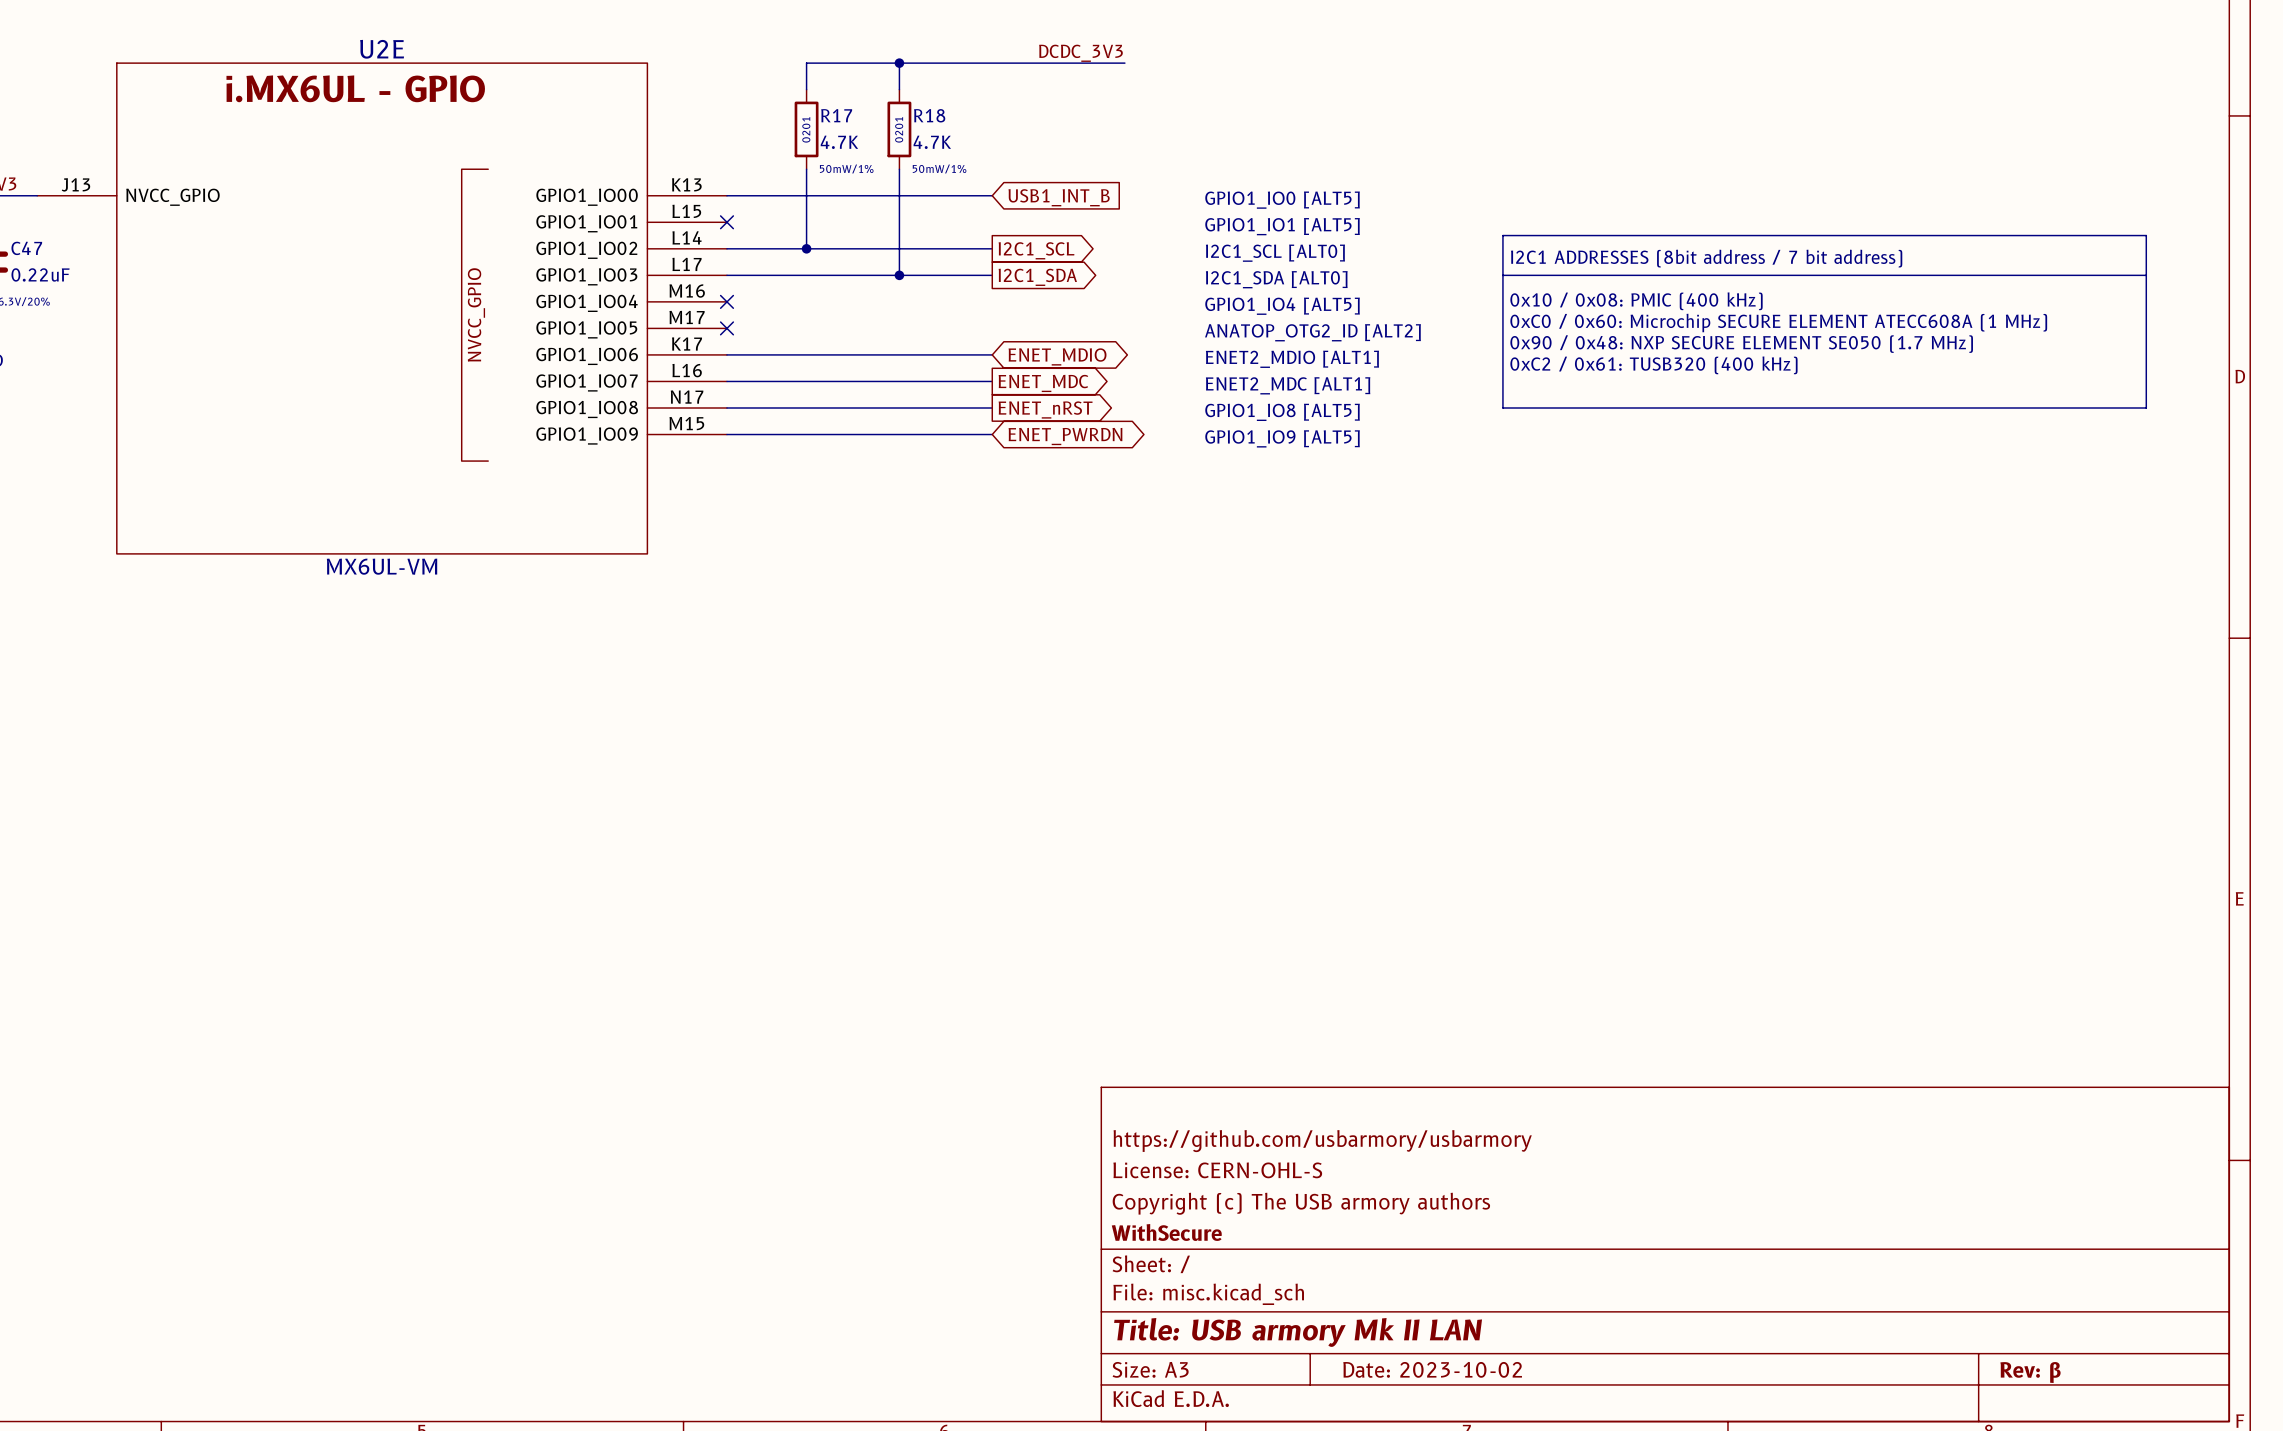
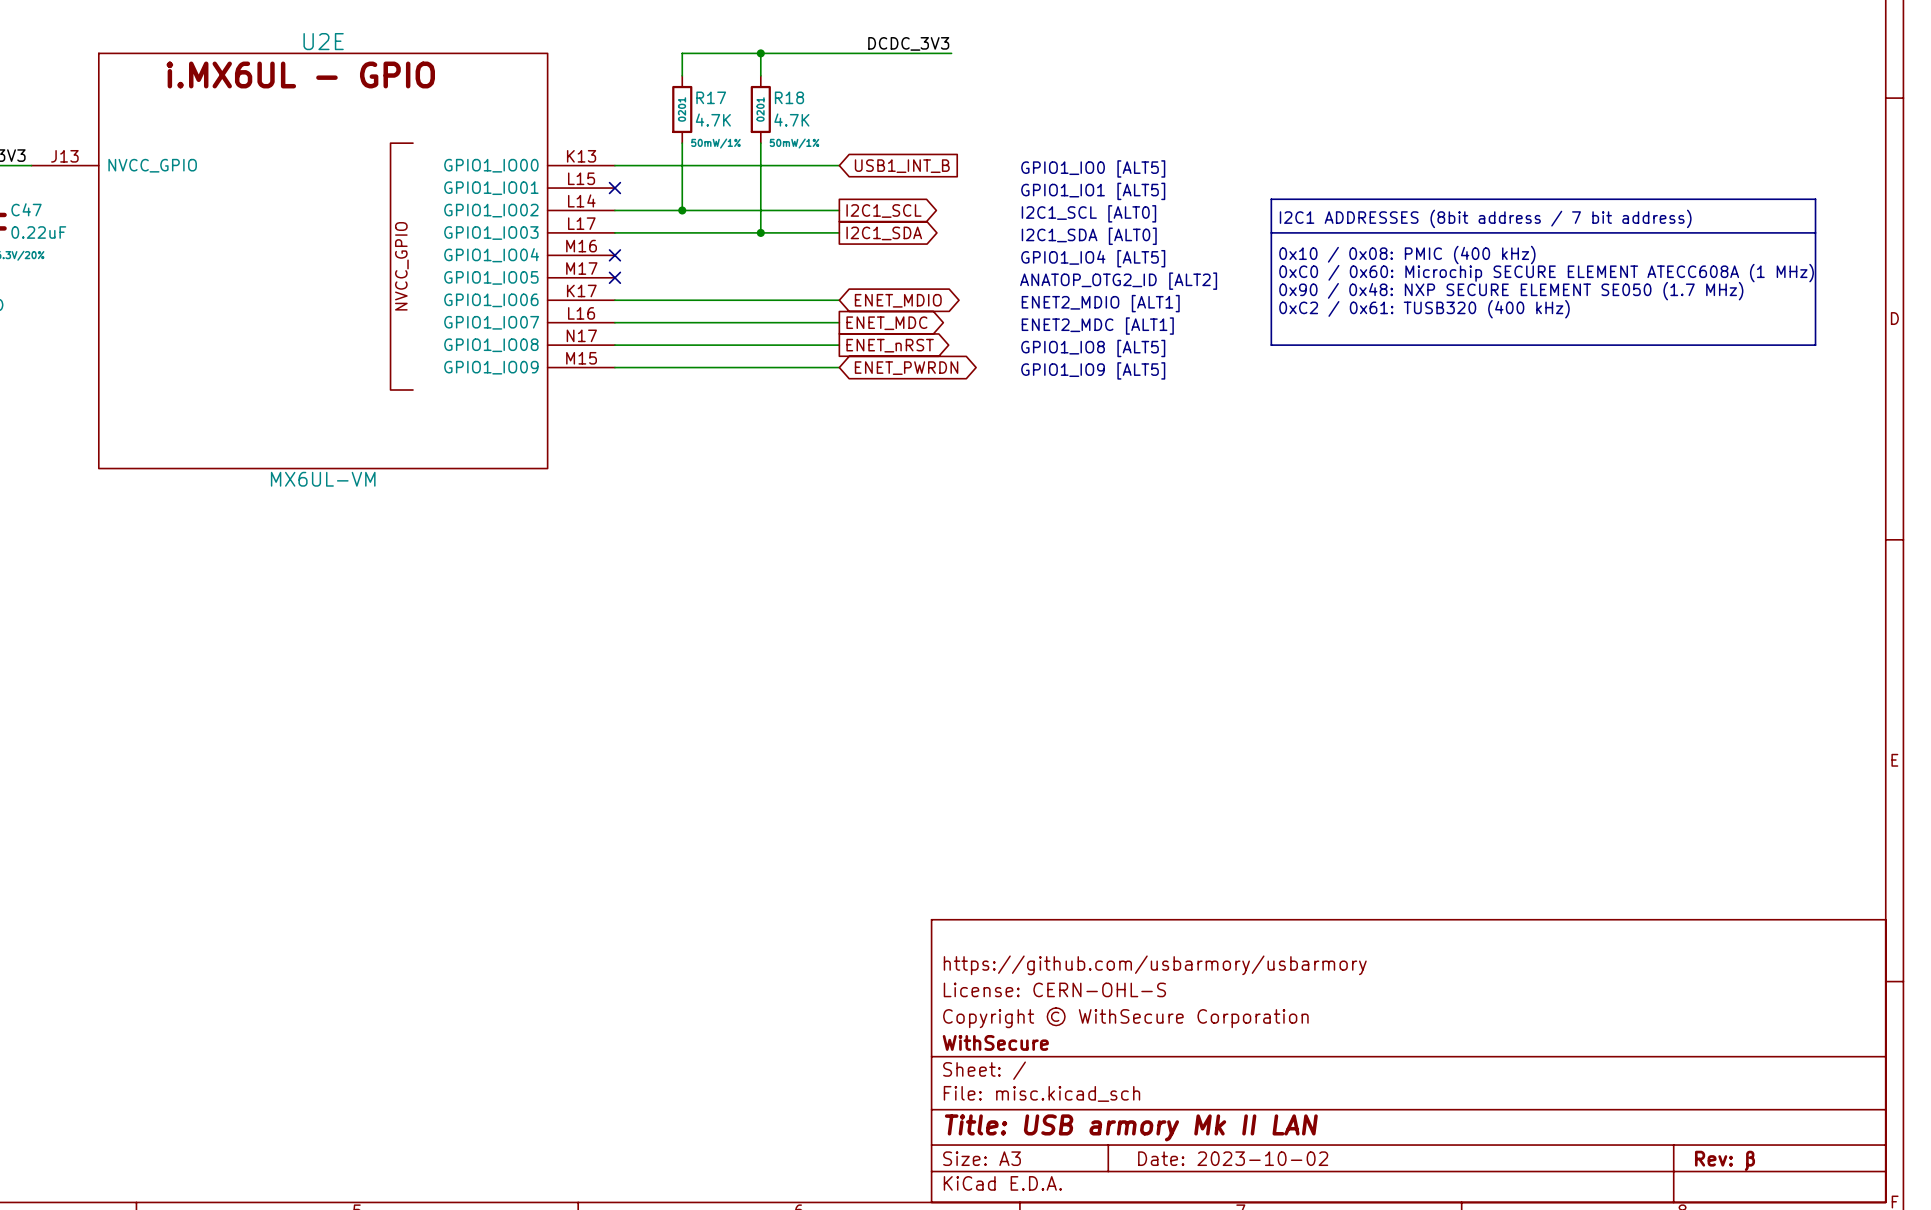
title block: Copyright (c) The USB armory authors (1301, 1203) -> Copyright © WithSecure Corporation (1125, 1017)

